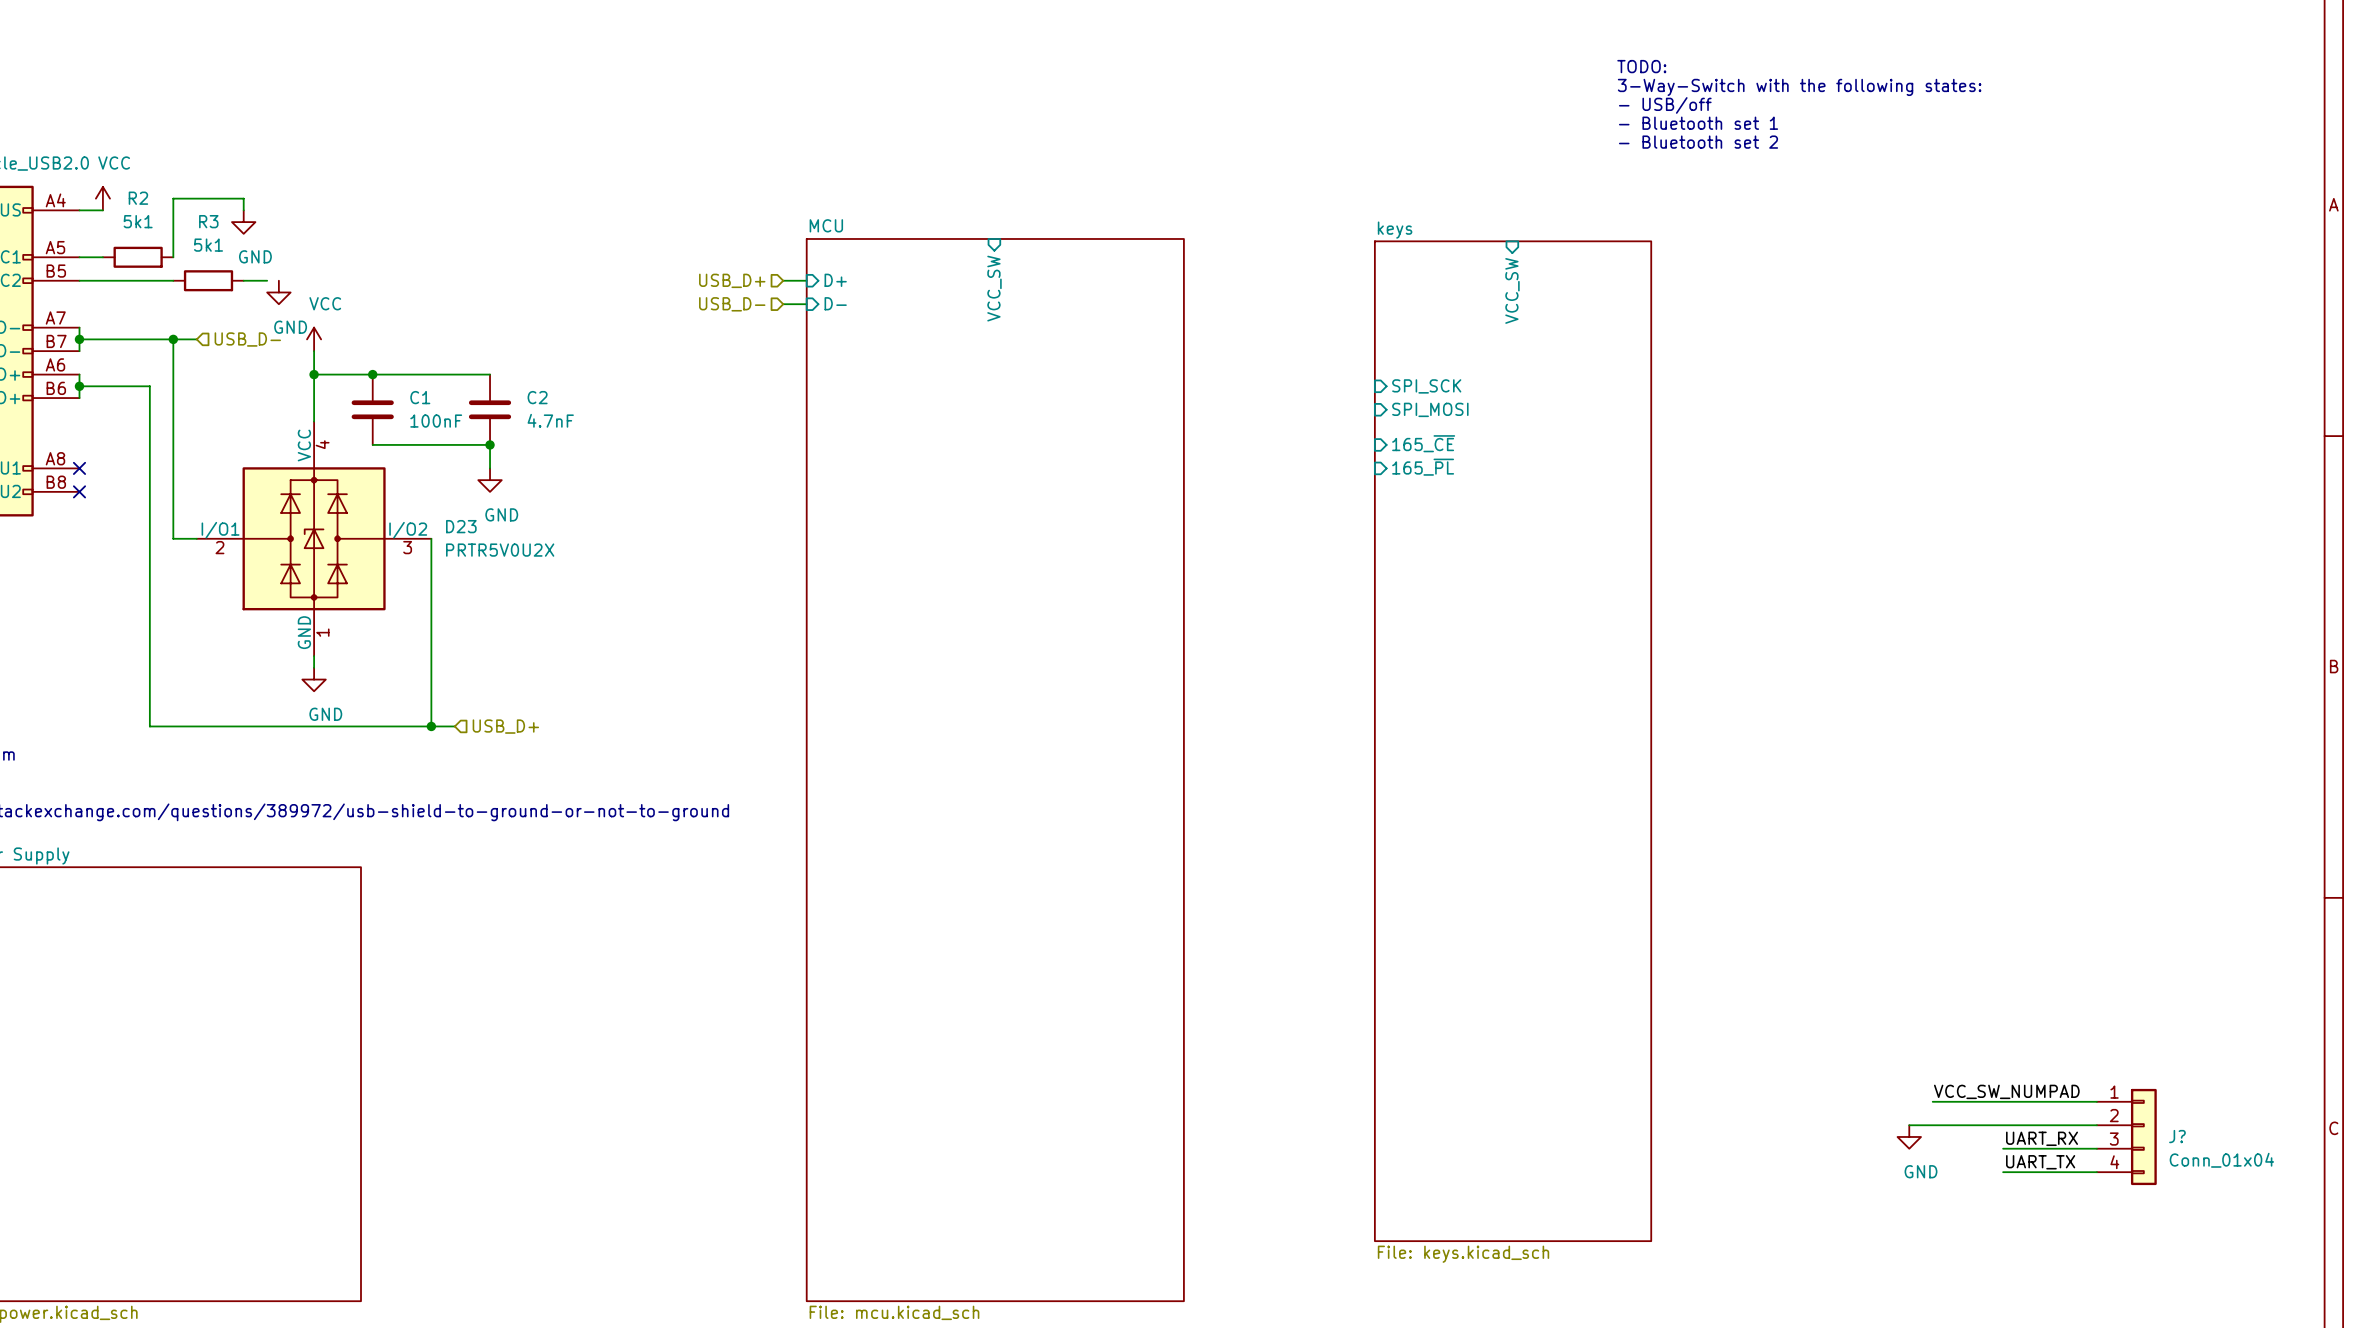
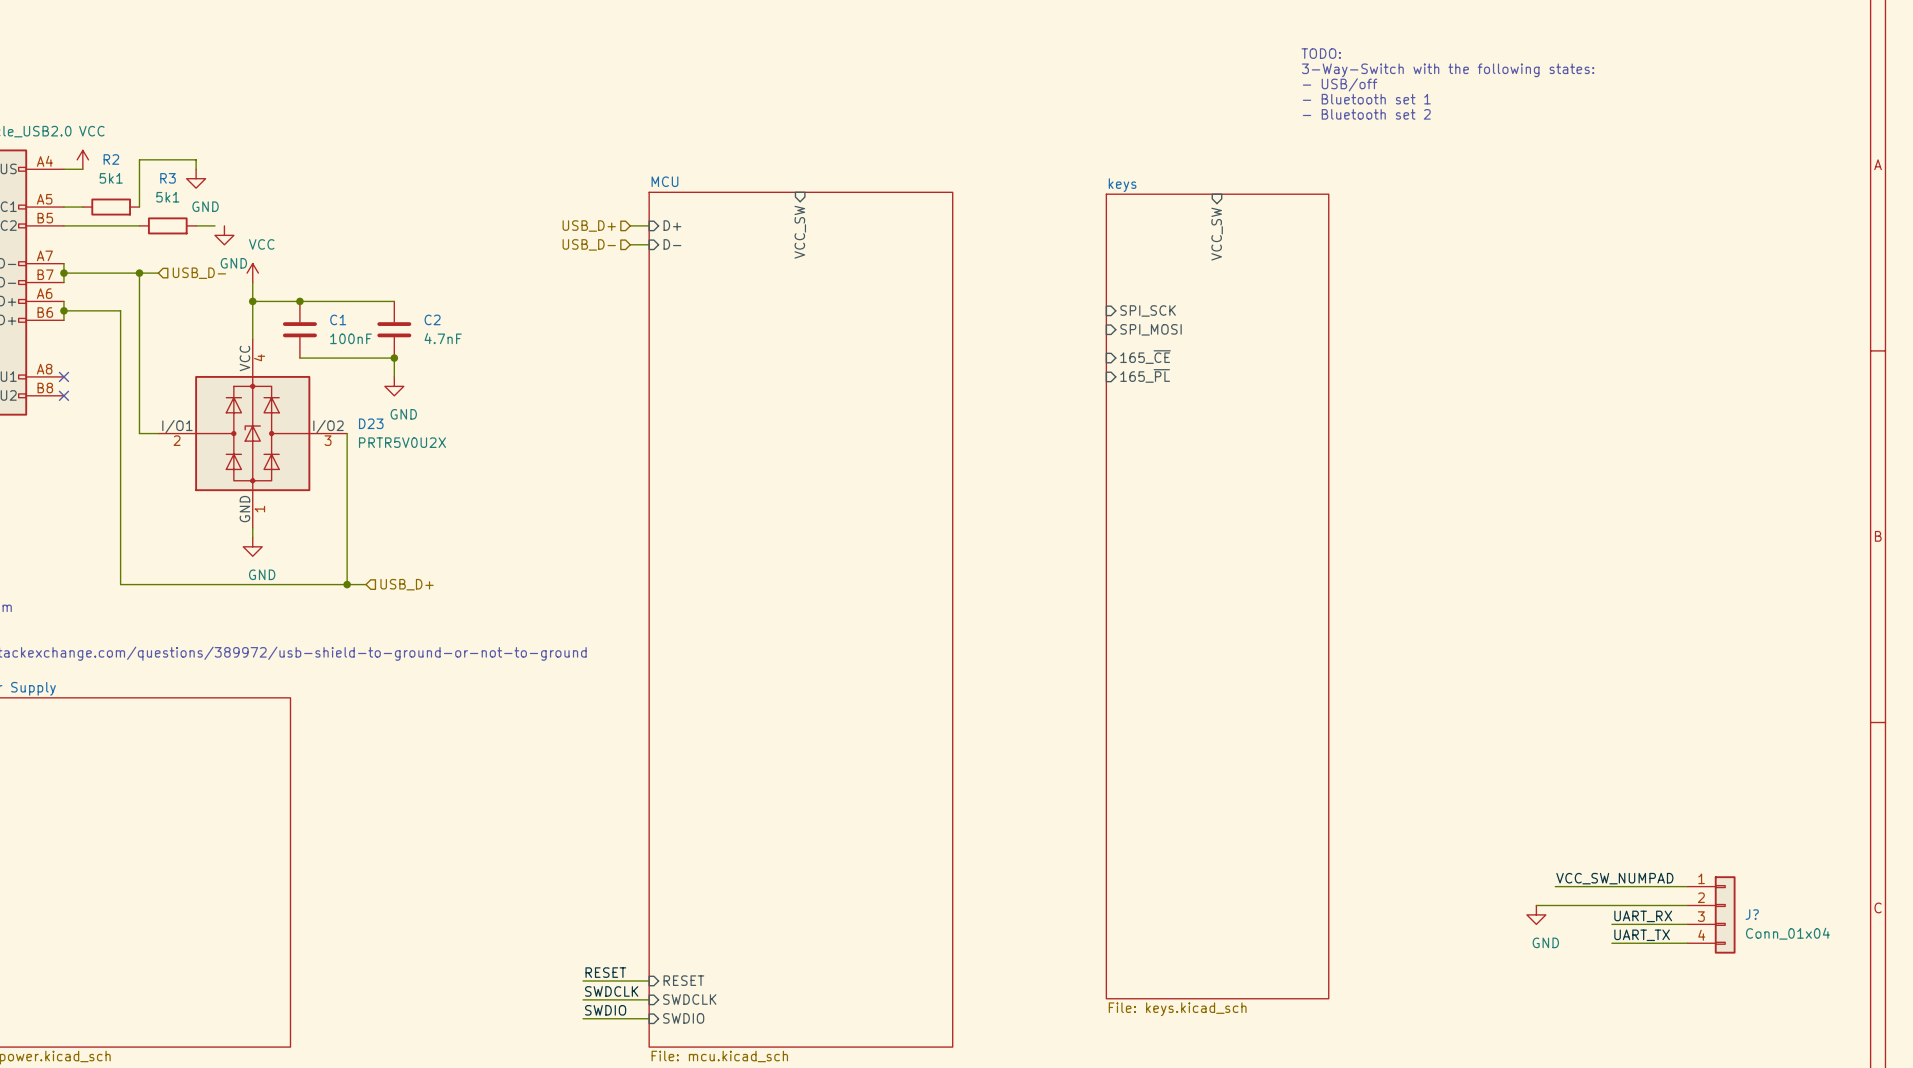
label: none -> RESET (605, 972)
sheet pin: none -> RESET (683, 980)
wire: none -> (583, 981) (649, 981)
label: none -> SWDCLK (611, 991)
wire: none -> (583, 999) (649, 999)
sheet pin: none -> SWDCLK (689, 999)
label: none -> SWDIO (605, 1010)
sheet pin: none -> SWDIO (683, 1018)
wire: none -> (583, 1018) (649, 1018)

